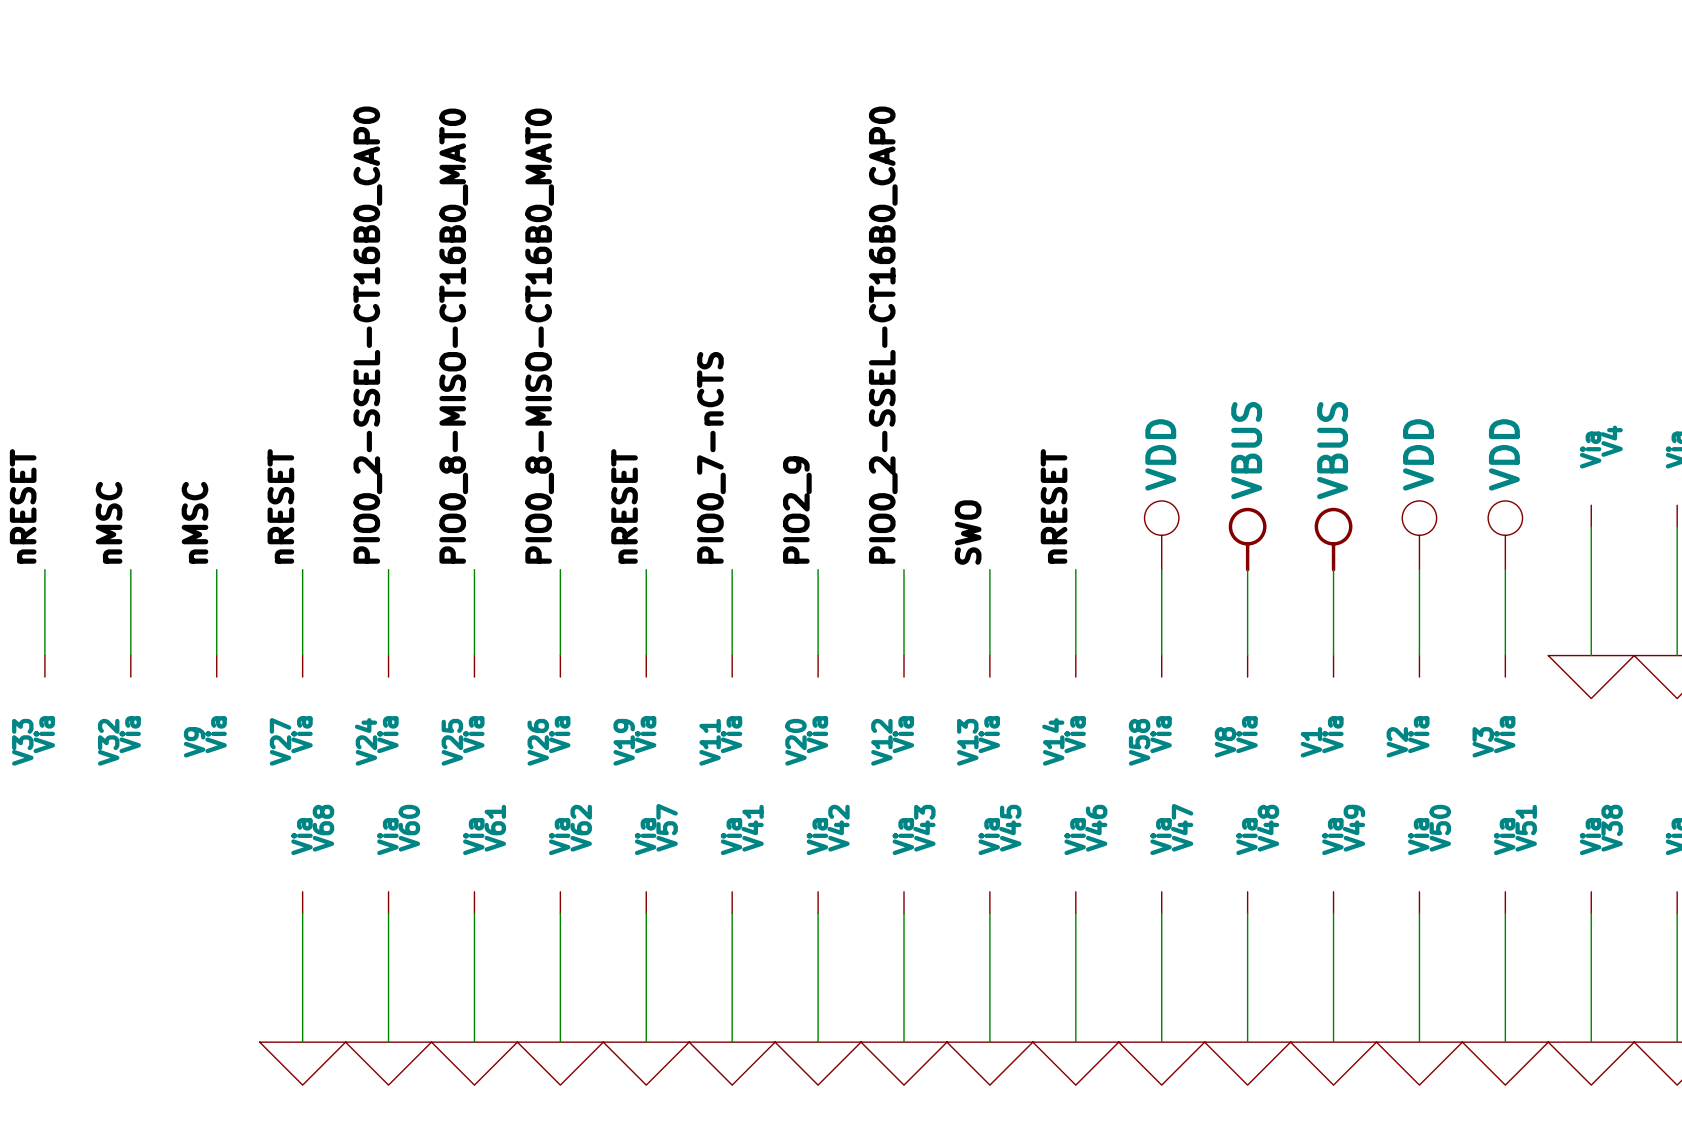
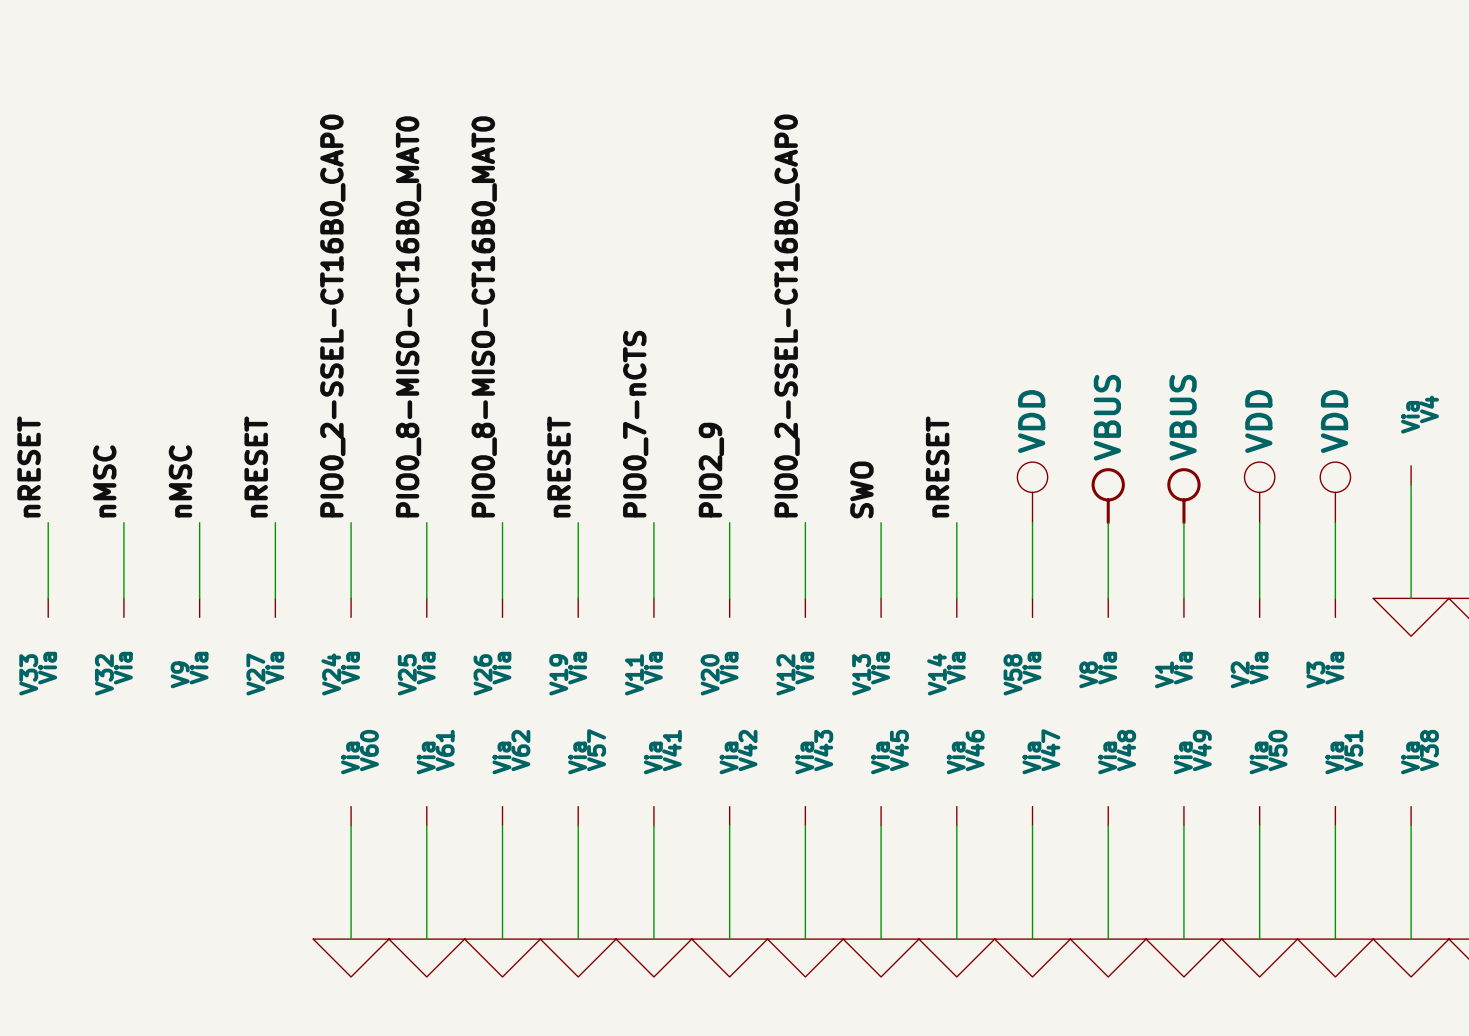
V68: (302, 902) -> none
wire: (302, 913) (302, 1042) -> none
power symbol: (302, 1063) -> none

